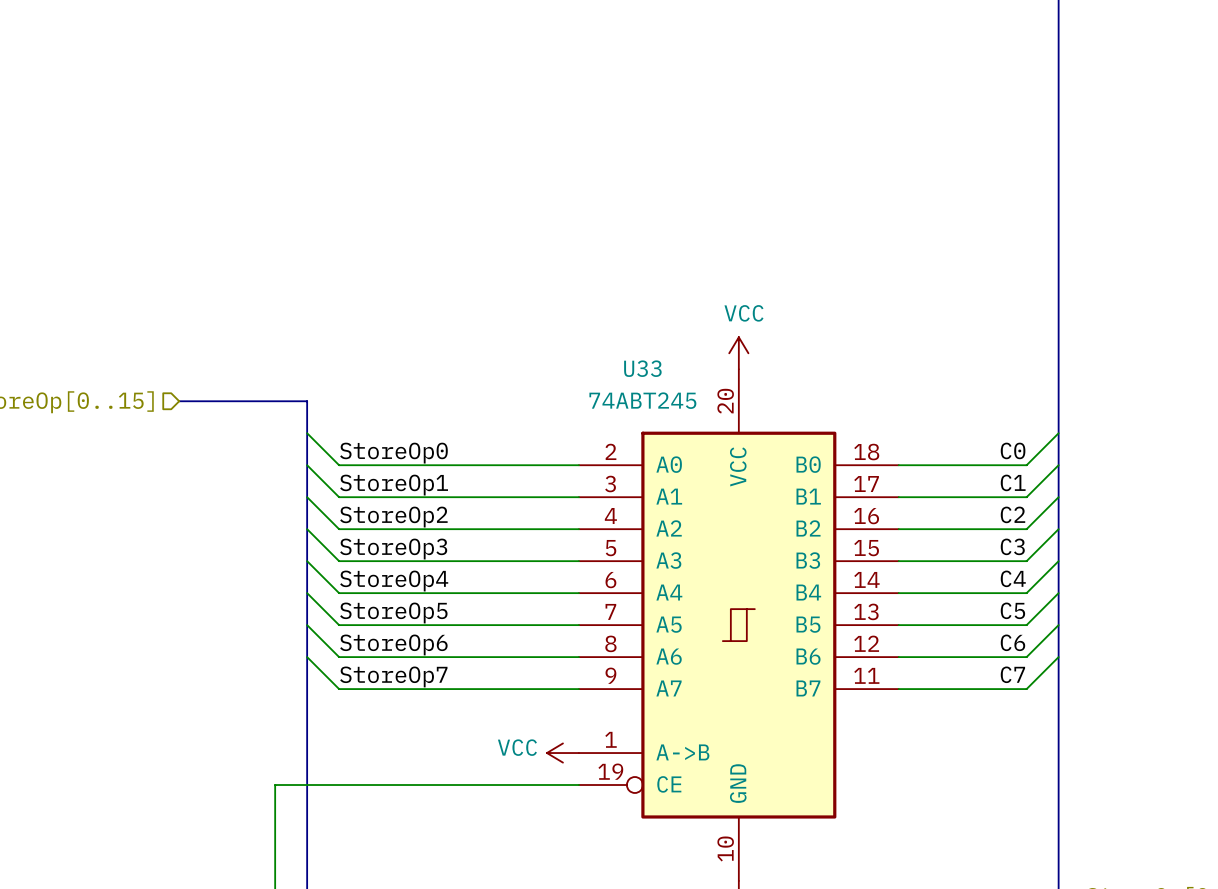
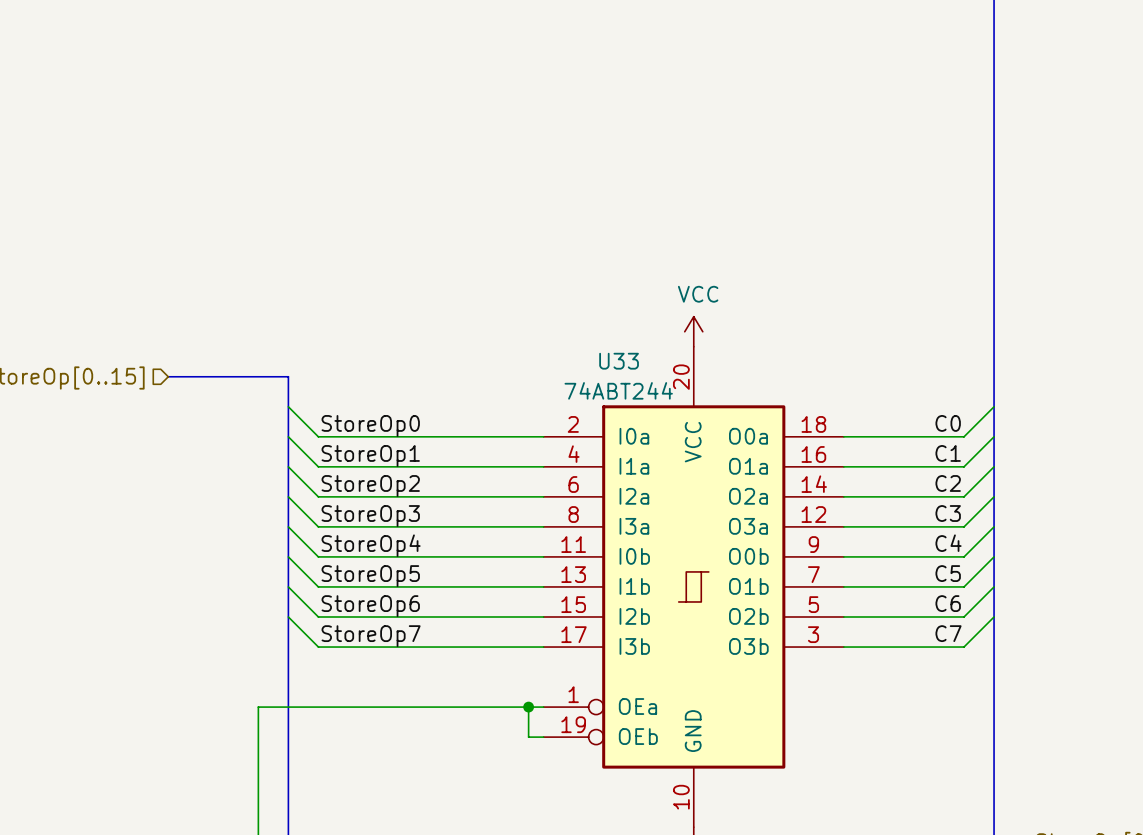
U33 symbol: [578, 369, 899, 881] -> [543, 346, 844, 828]
U33 value: 74ABT245 (642, 400) -> 74ABT244 (618, 390)
wire: none -> (528, 707) (528, 737)
power symbol: VCC (562, 753) -> none
junction: none -> (528, 707)
wire: (275, 785) (562, 785) -> (258, 737) (258, 707) (543, 707)

